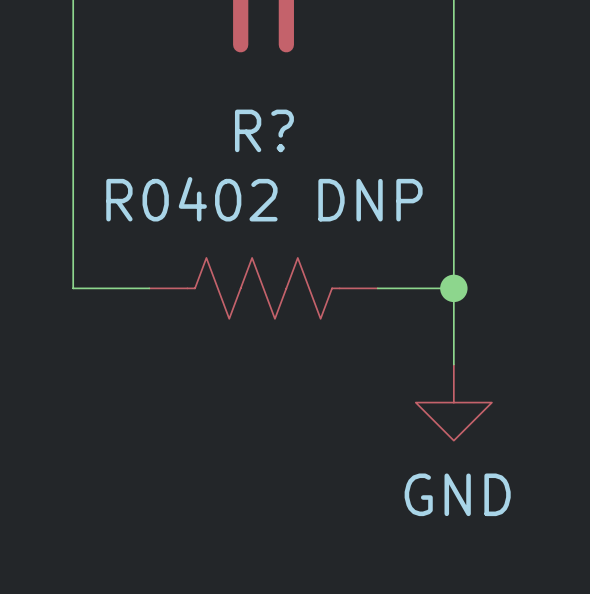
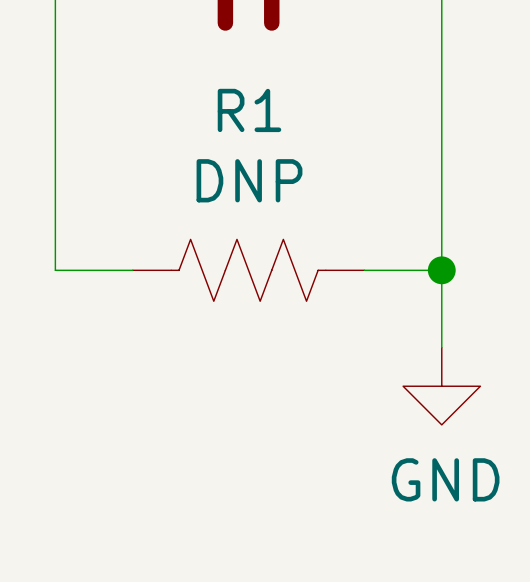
R? name: R? (264, 130) -> R1 (249, 110)
R? value: R0402 DNP (264, 199) -> DNP (249, 180)

